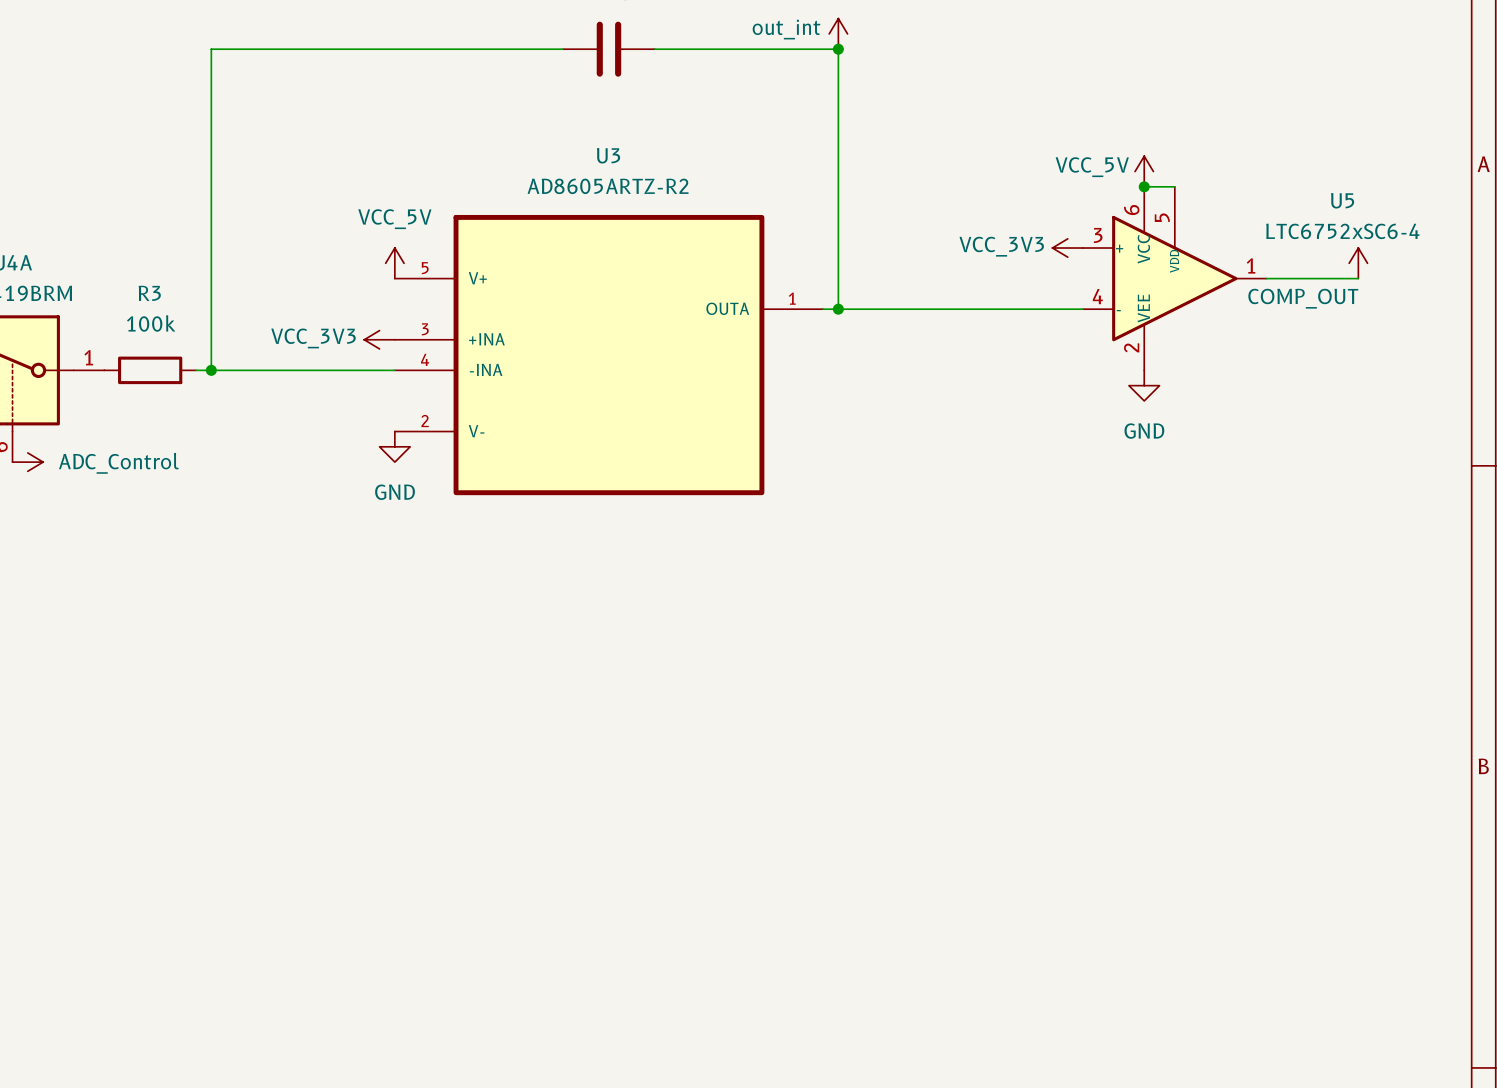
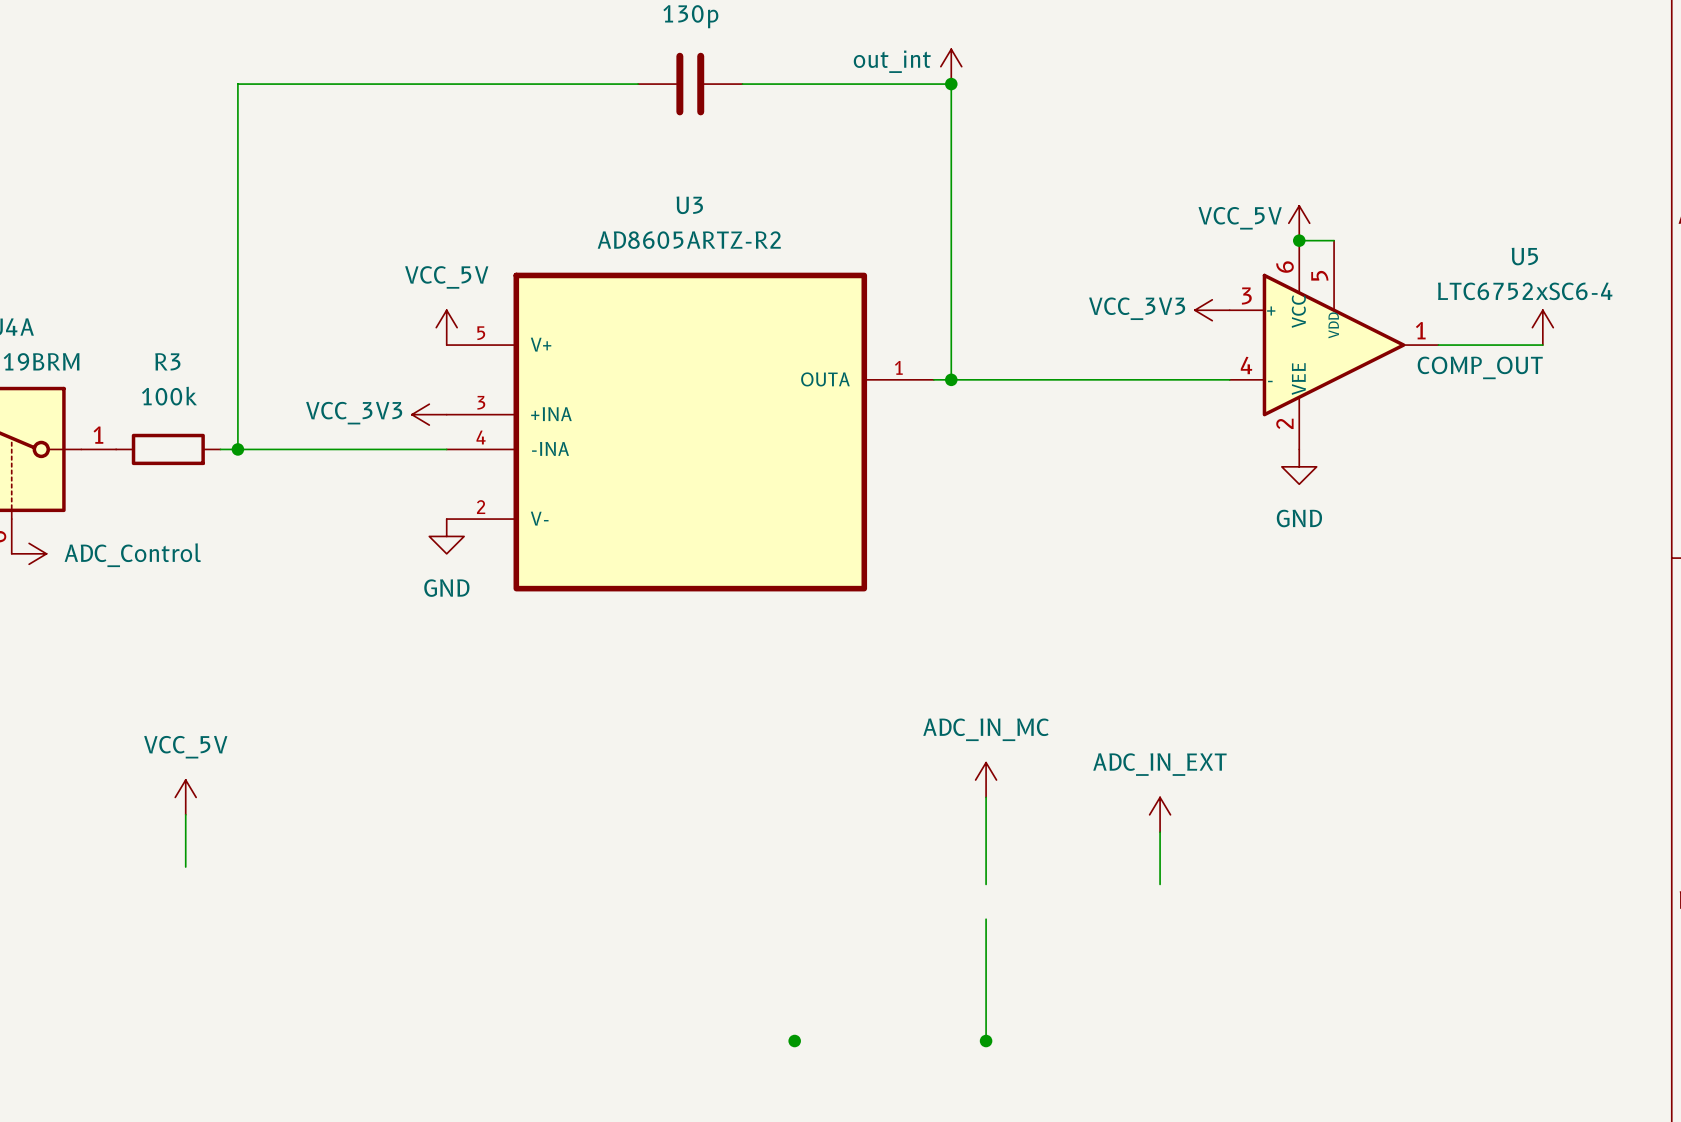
power symbol: none -> ADC_IN_MC (986, 780)
power symbol: none -> VCC_5V (185, 797)
wire: none -> (986, 797) (986, 884)
wire: none -> (185, 814) (185, 867)
power symbol: none -> ADC_IN_EXT (1160, 814)
wire: none -> (1160, 832) (1160, 884)
wire: none -> (986, 919) (986, 1041)
junction: none -> (794, 1041)
junction: none -> (986, 1041)

